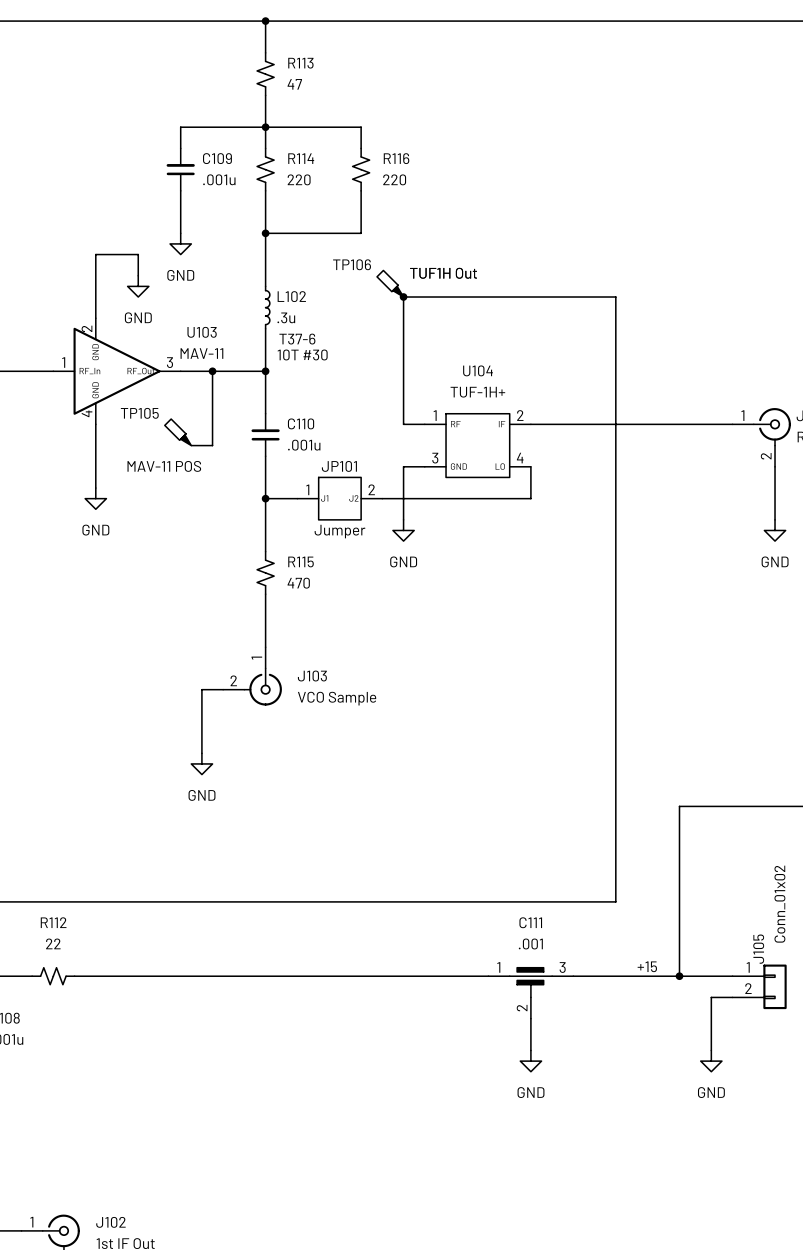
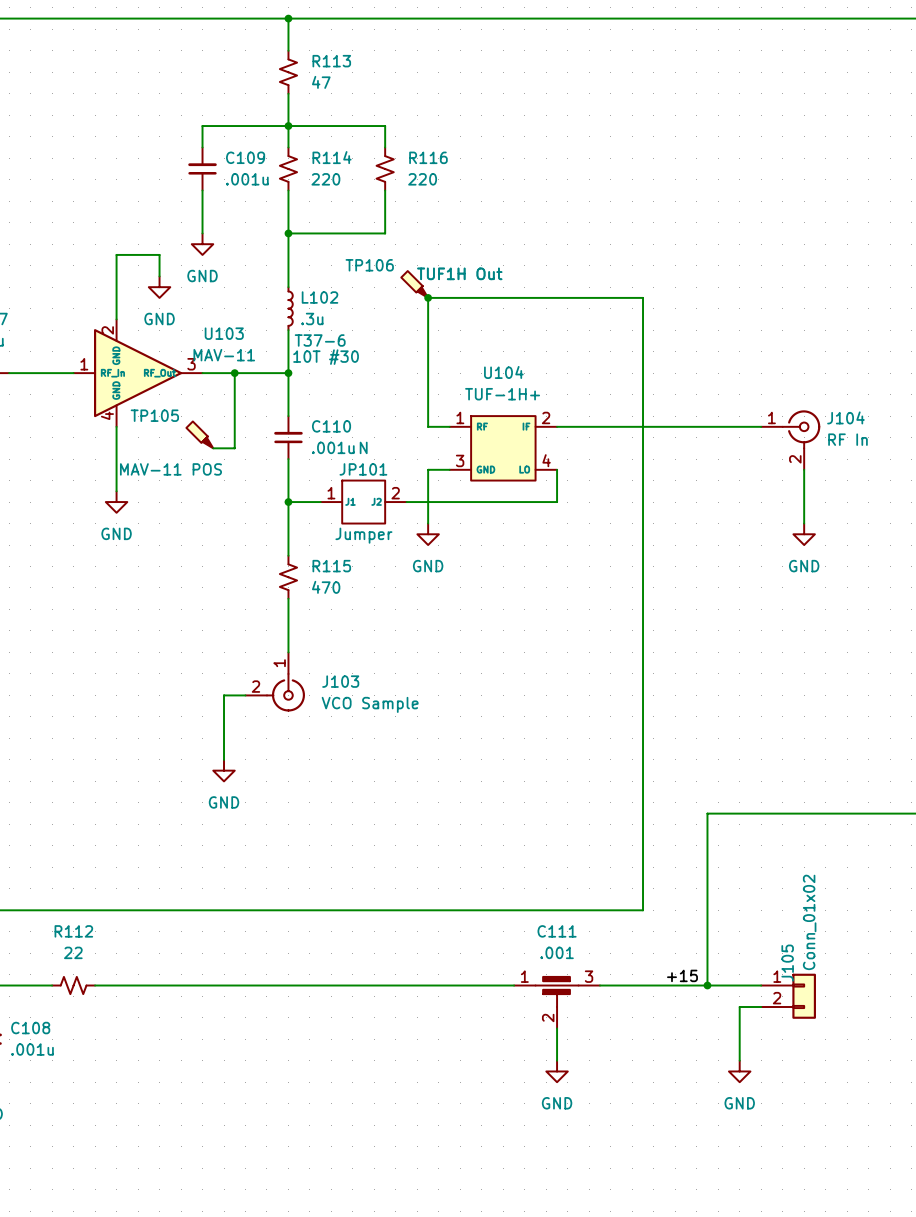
JP101 text: none -> N (363, 447)

